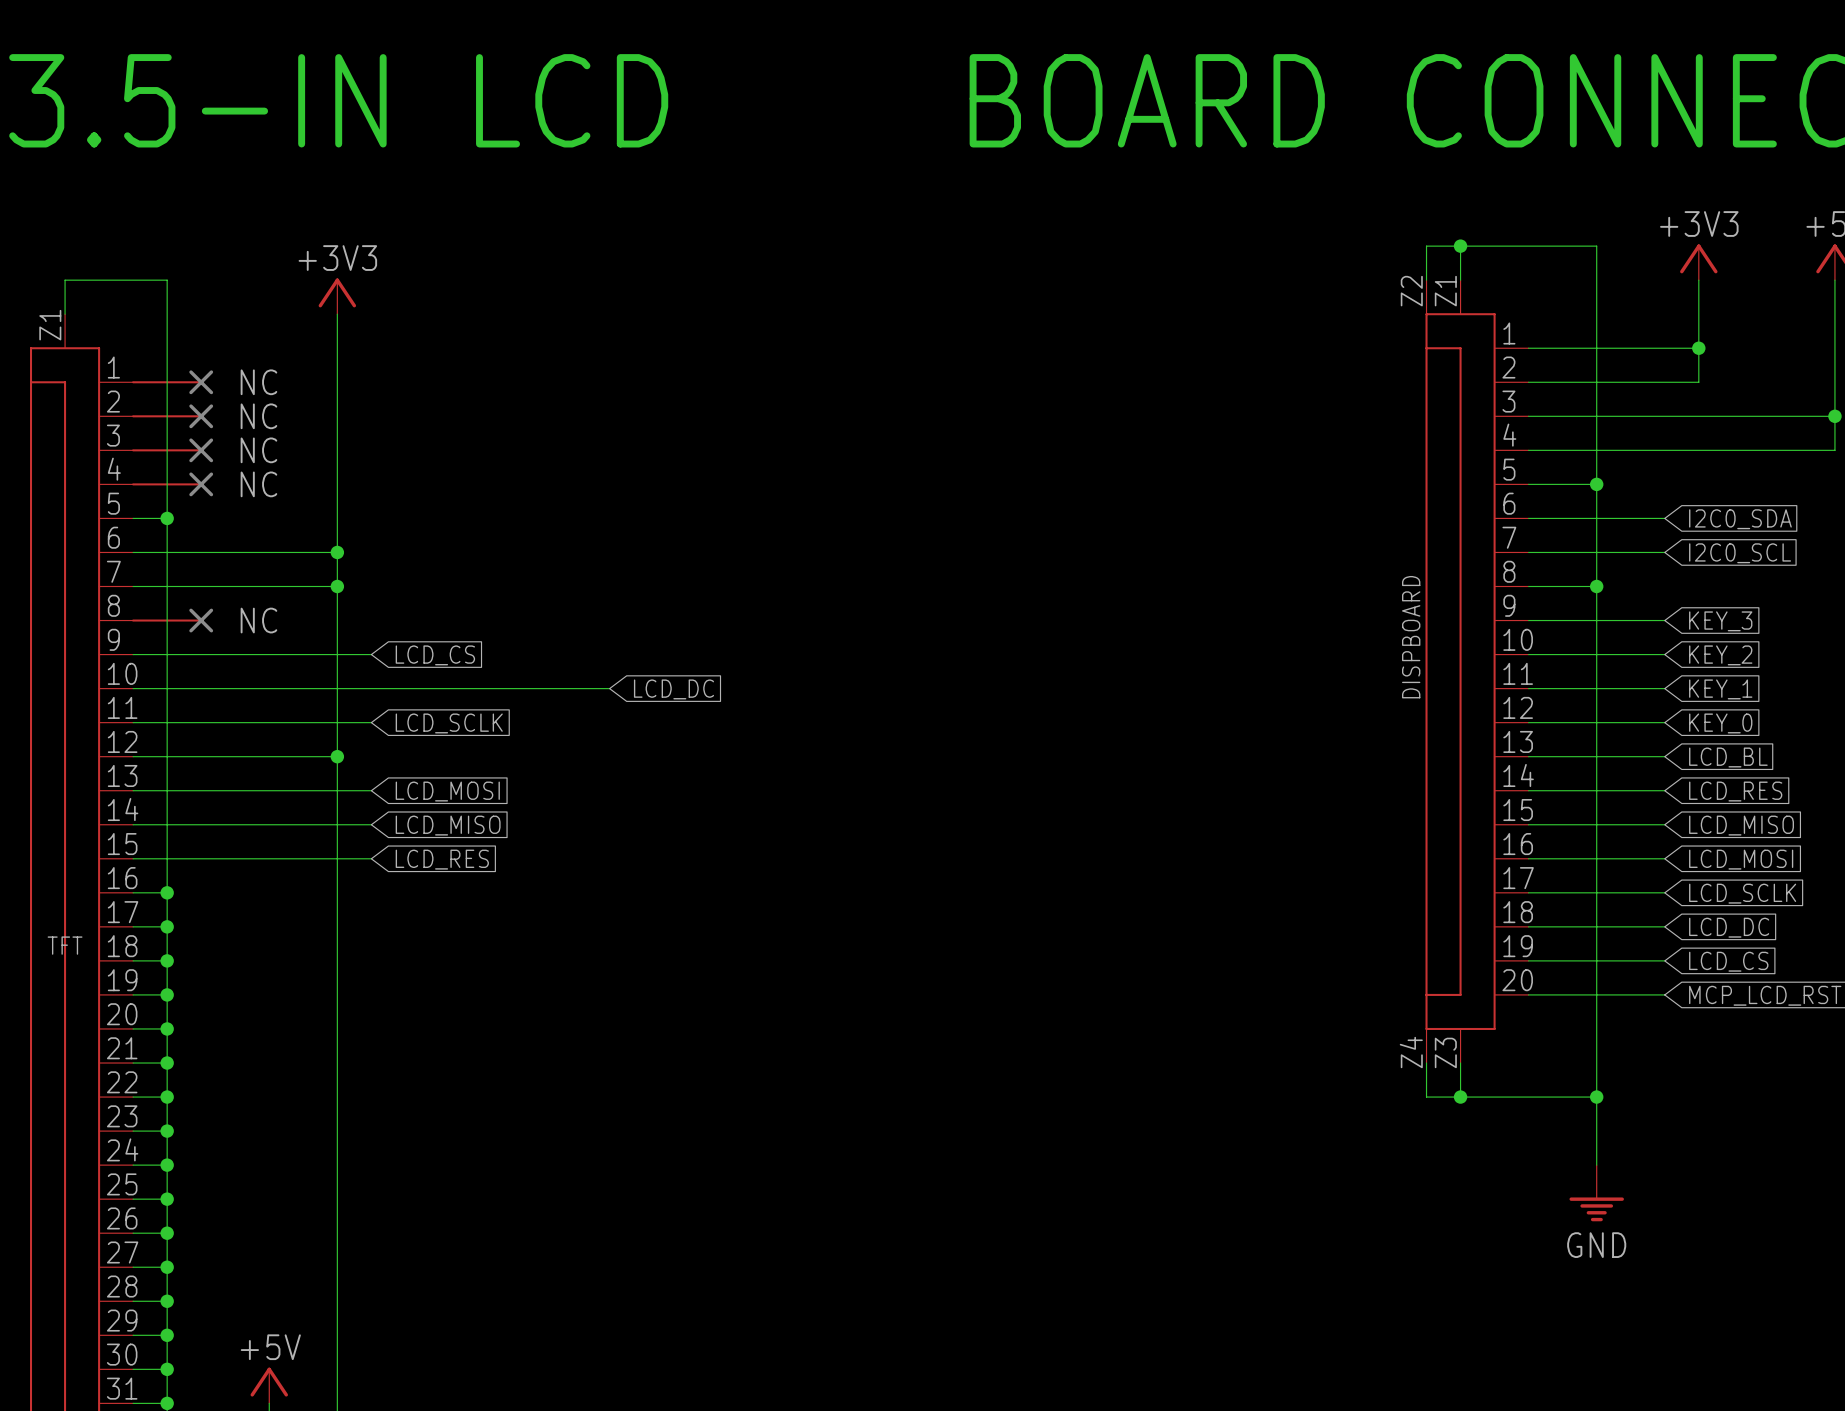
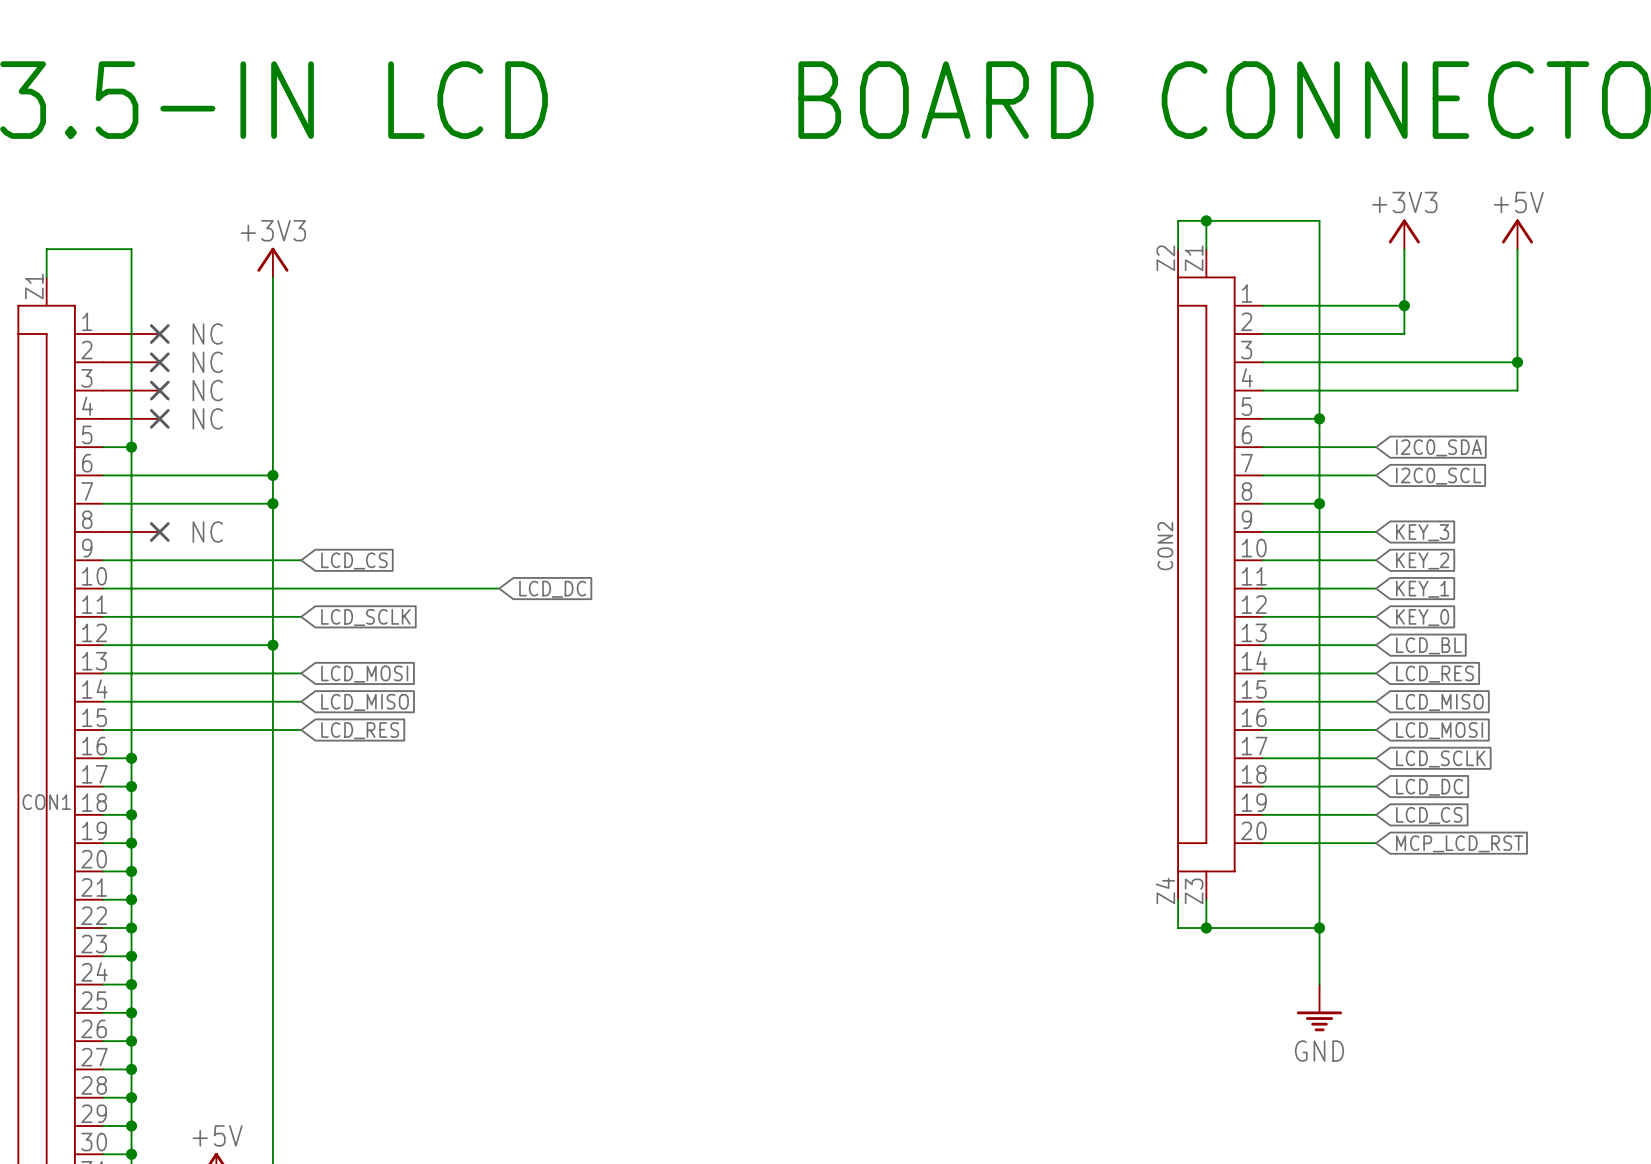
DISPBOARD name: DISPBOARD (1411, 637) -> CON2 (1165, 546)
TFT name: TFT (65, 945) -> CON1 (46, 802)

